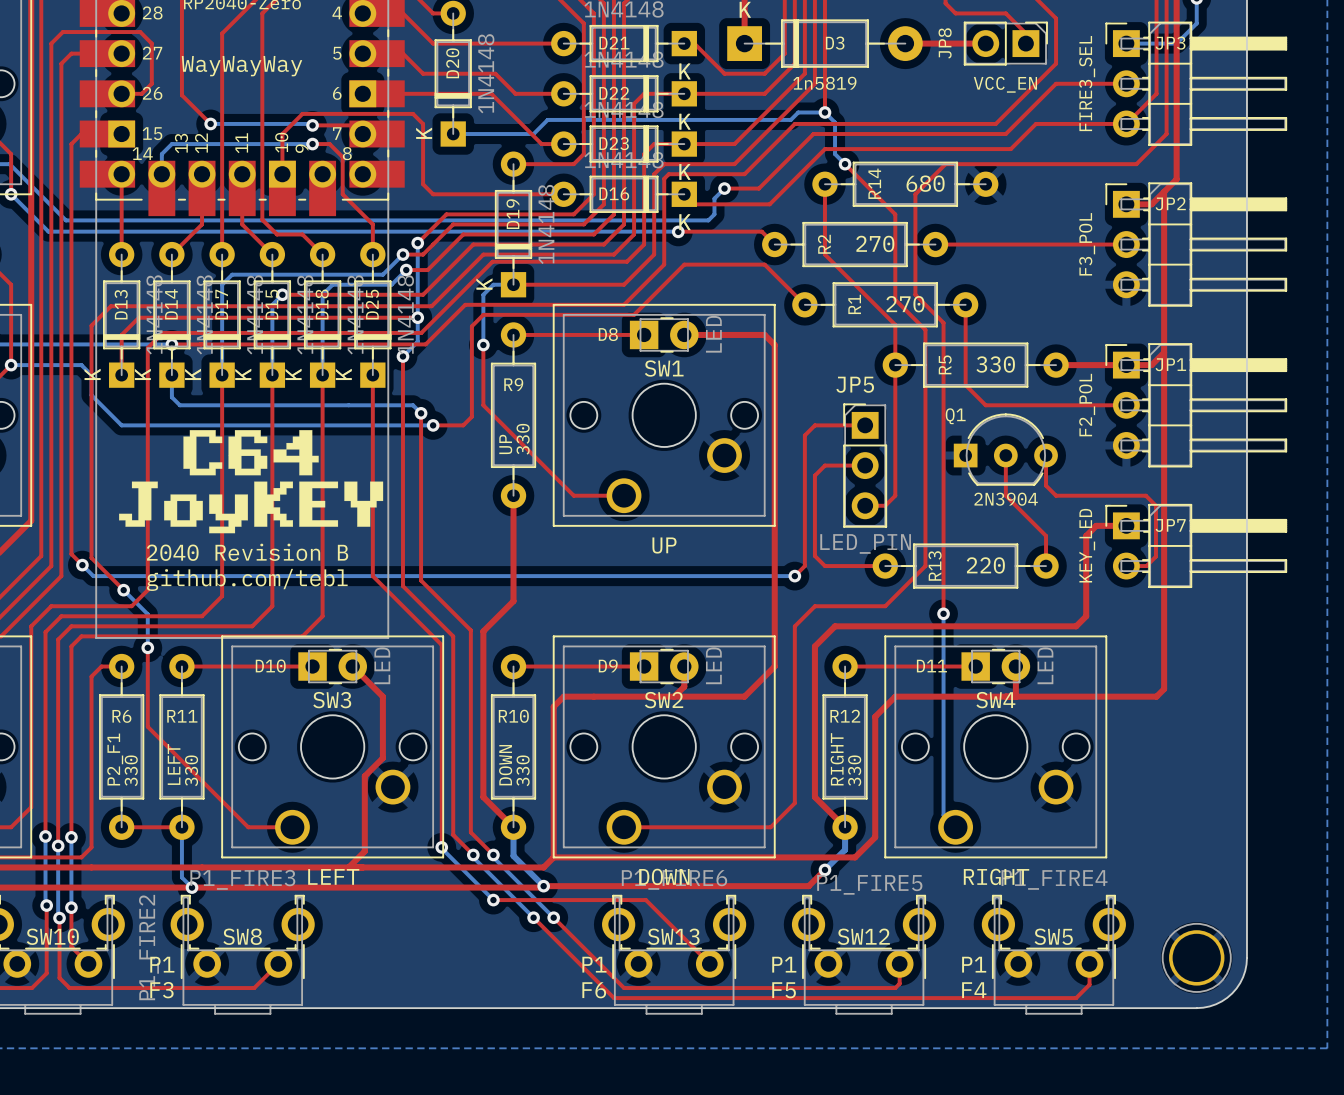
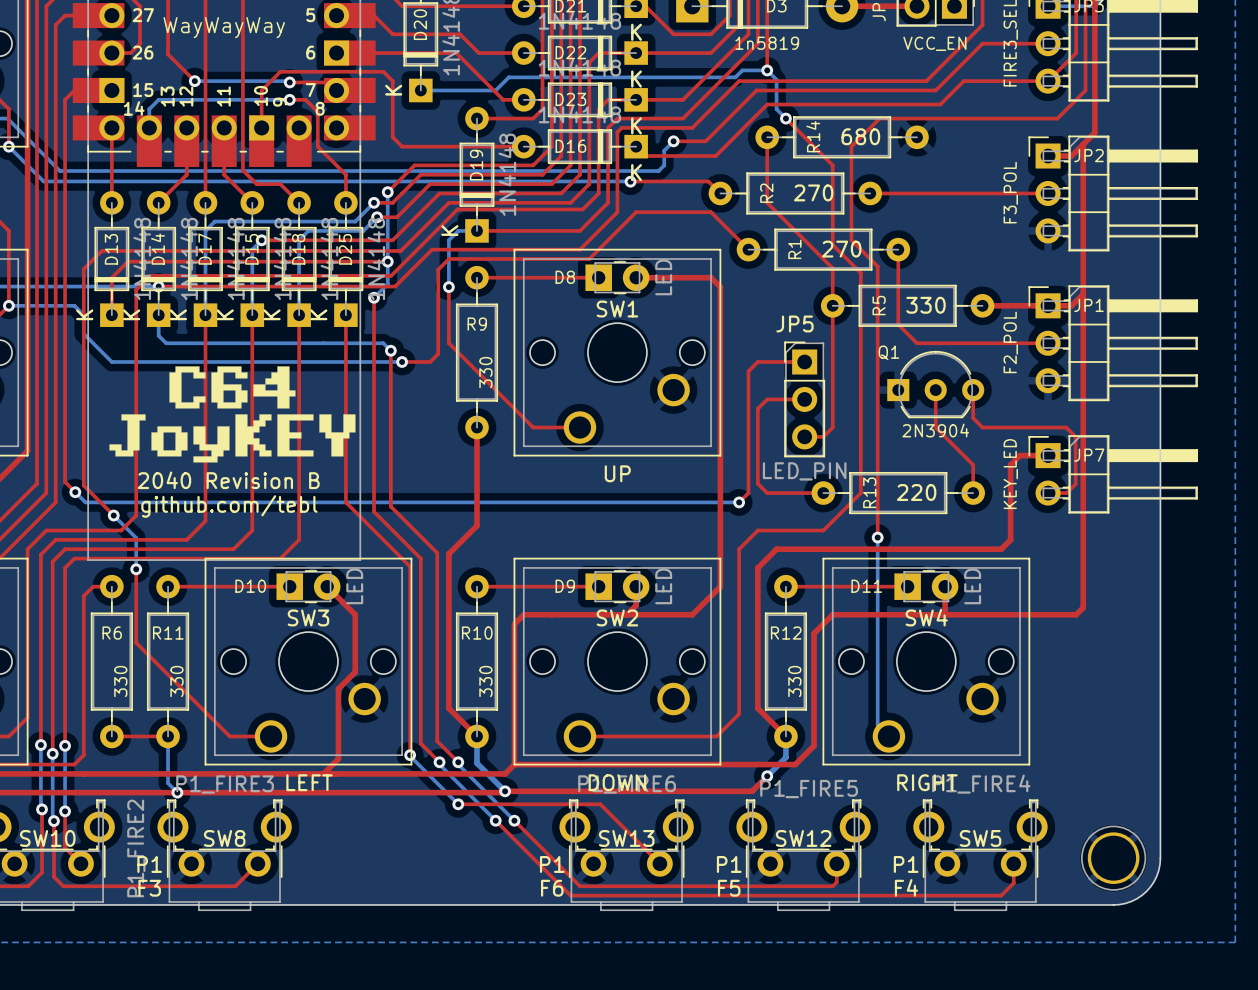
text: UP (505, 444) -> none
text: P2_F1 (115, 759) -> none
text: RIGHT (837, 759) -> none
text: LEFT (174, 764) -> none
text: DOWN (505, 765) -> none

